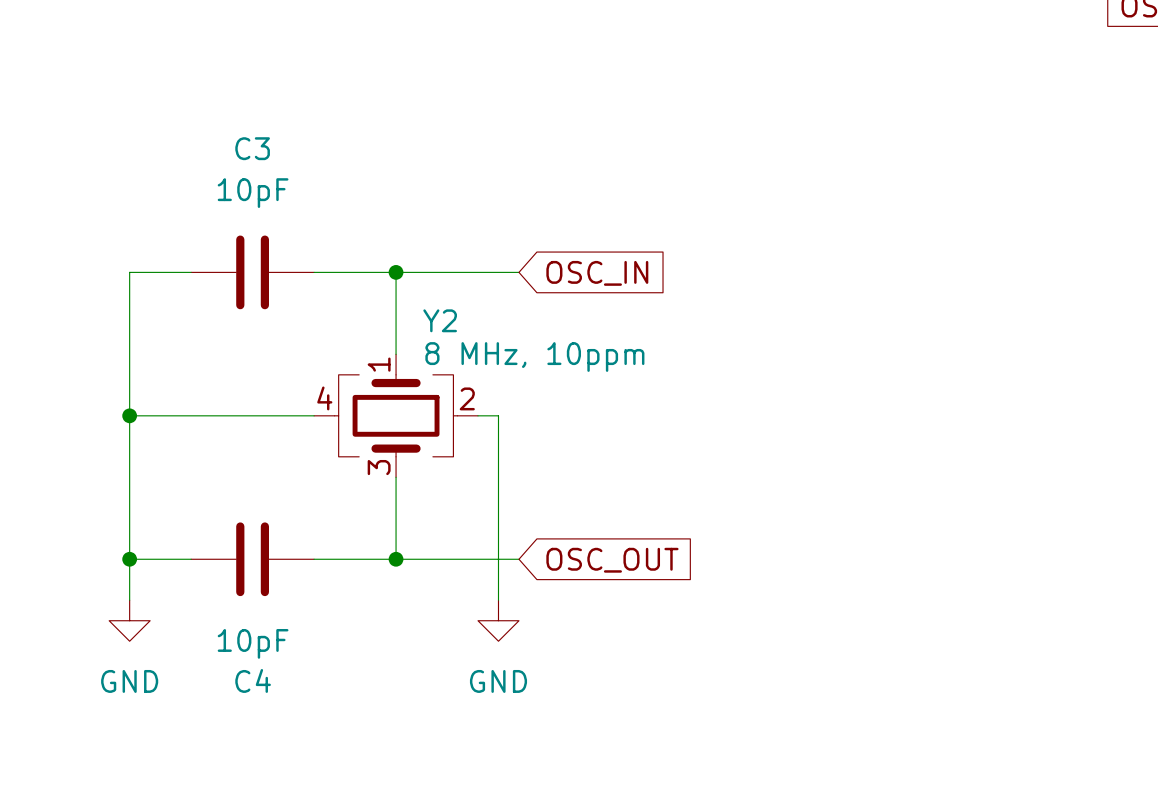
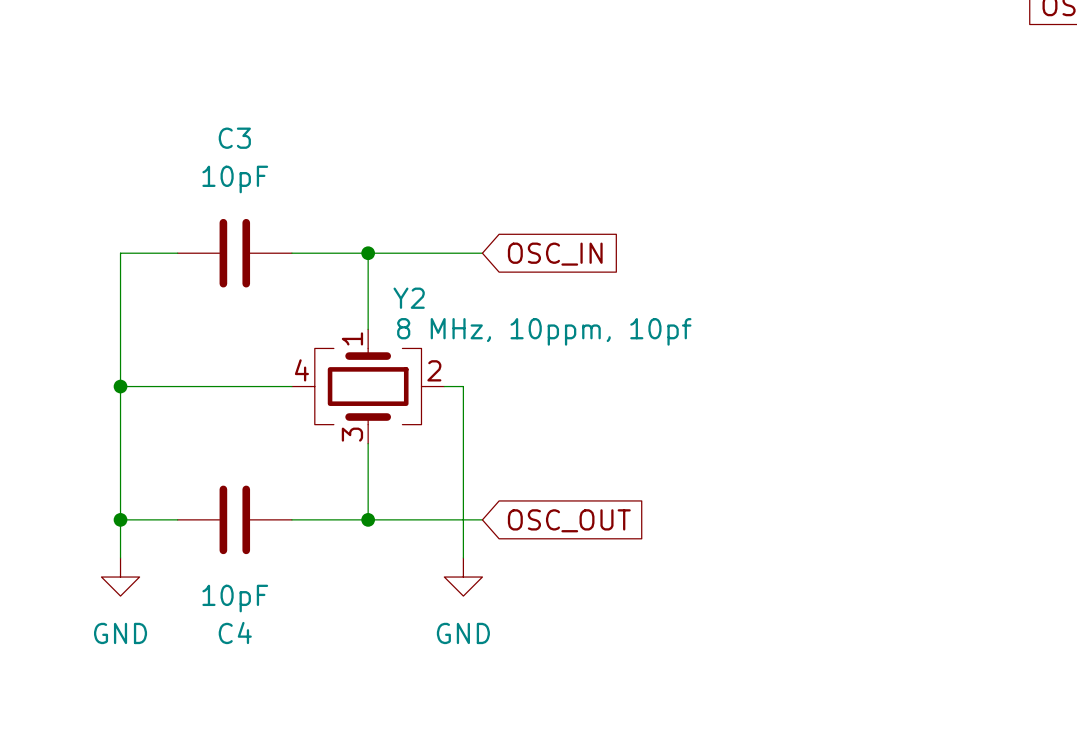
Y2 value: 8 MHz, 10ppm (534, 357) -> 8 MHz, 10ppm, 10pf (544, 331)

